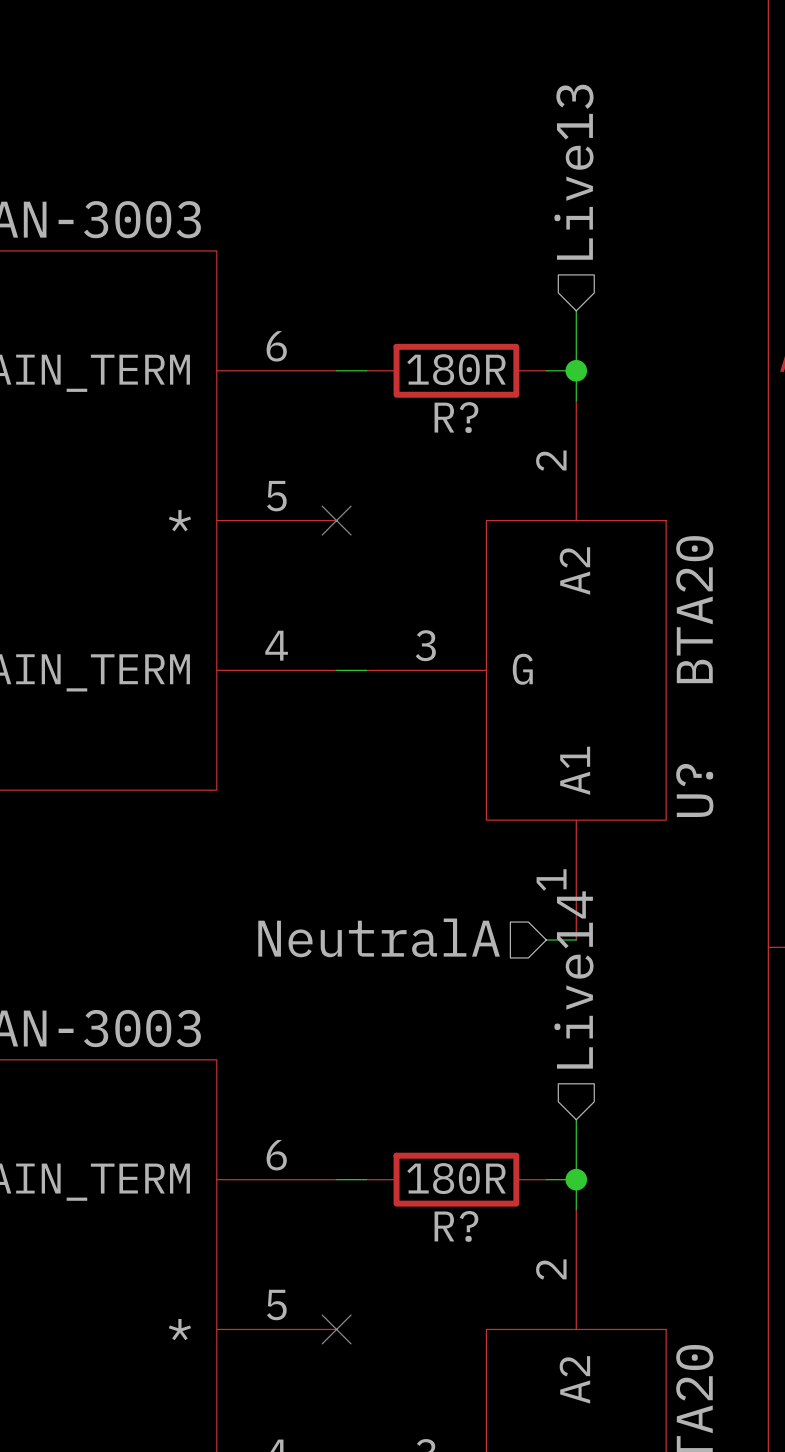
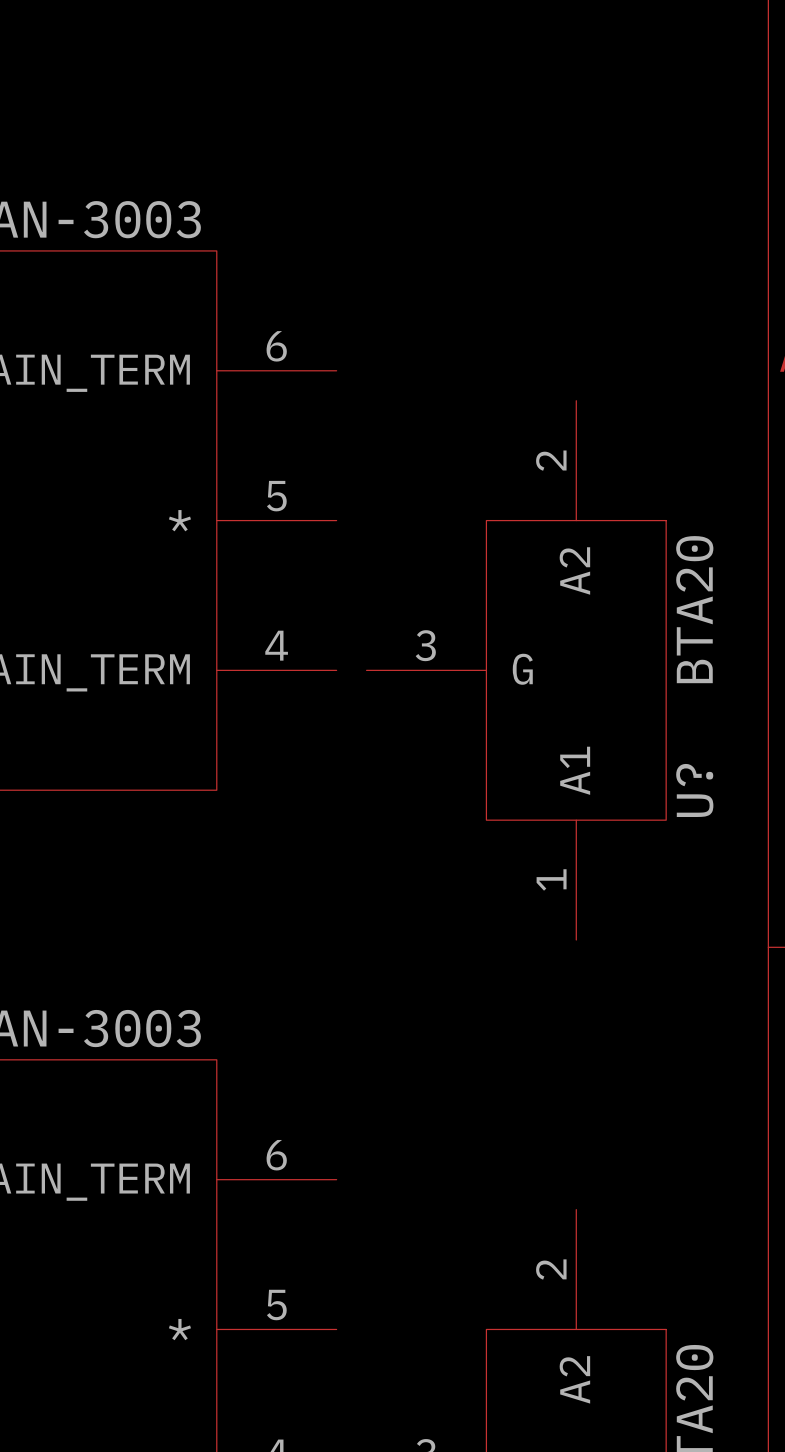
hierarchical label: Live13 (573, 172) -> none
wire: (576, 310) (576, 400) -> none
wire: (336, 370) (366, 370) -> none
R?: 180R (456, 370) -> none
wire: (546, 370) (576, 370) -> none
junction: (576, 370) -> none
no-connect mark: (336, 520) -> none
wire: (336, 670) (366, 670) -> none
hierarchical label: NeutralA (379, 937) -> none
wire: (546, 940) (576, 940) -> none
hierarchical label: Live14 (573, 979) -> none
wire: (576, 1119) (576, 1209) -> none
wire: (336, 1179) (366, 1179) -> none
R?: 180R (456, 1179) -> none
wire: (546, 1179) (576, 1179) -> none
junction: (576, 1179) -> none
no-connect mark: (336, 1329) -> none

